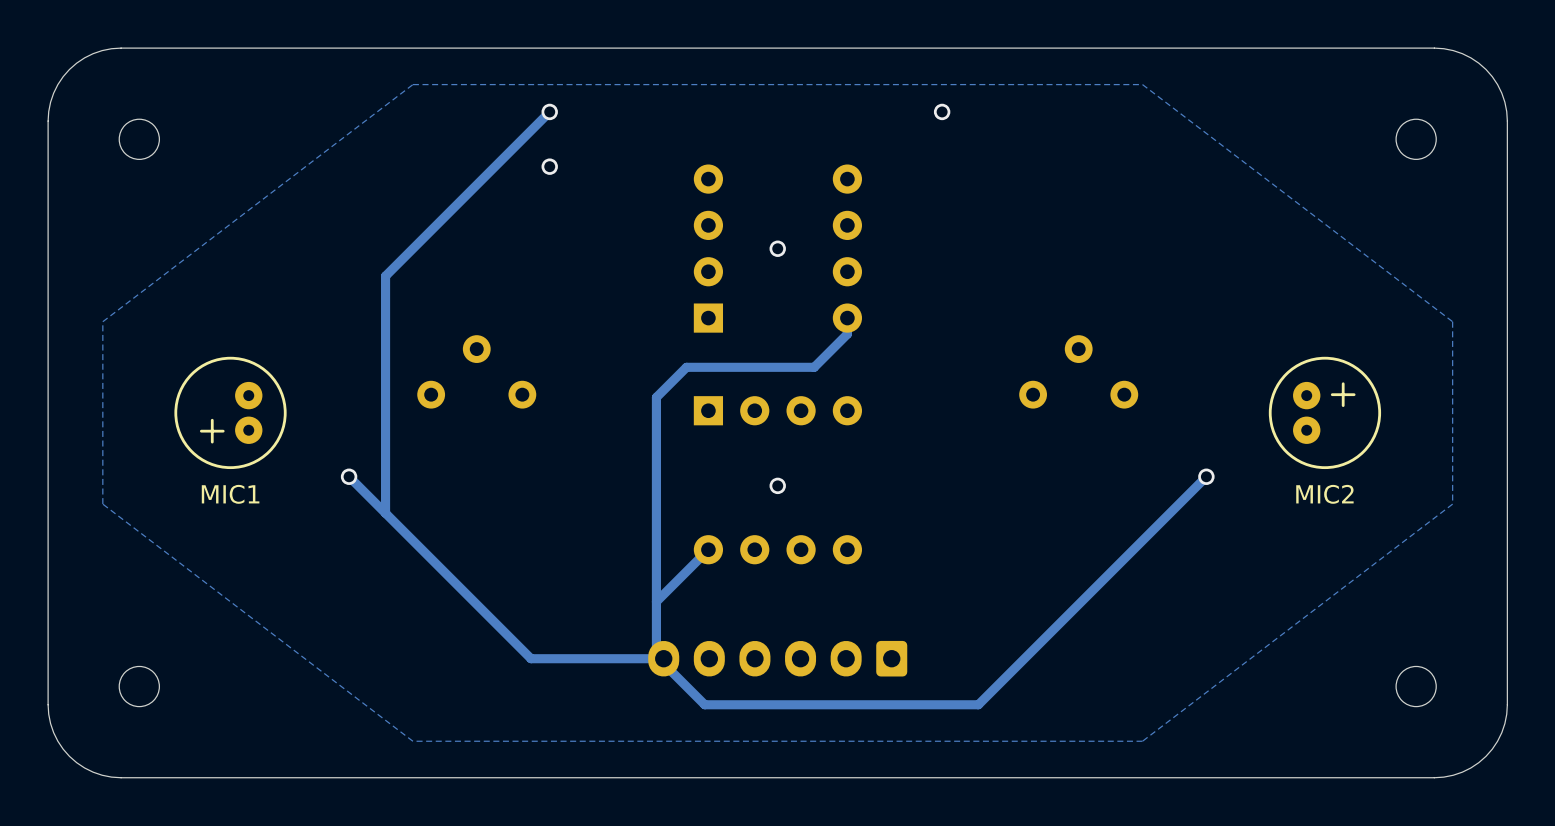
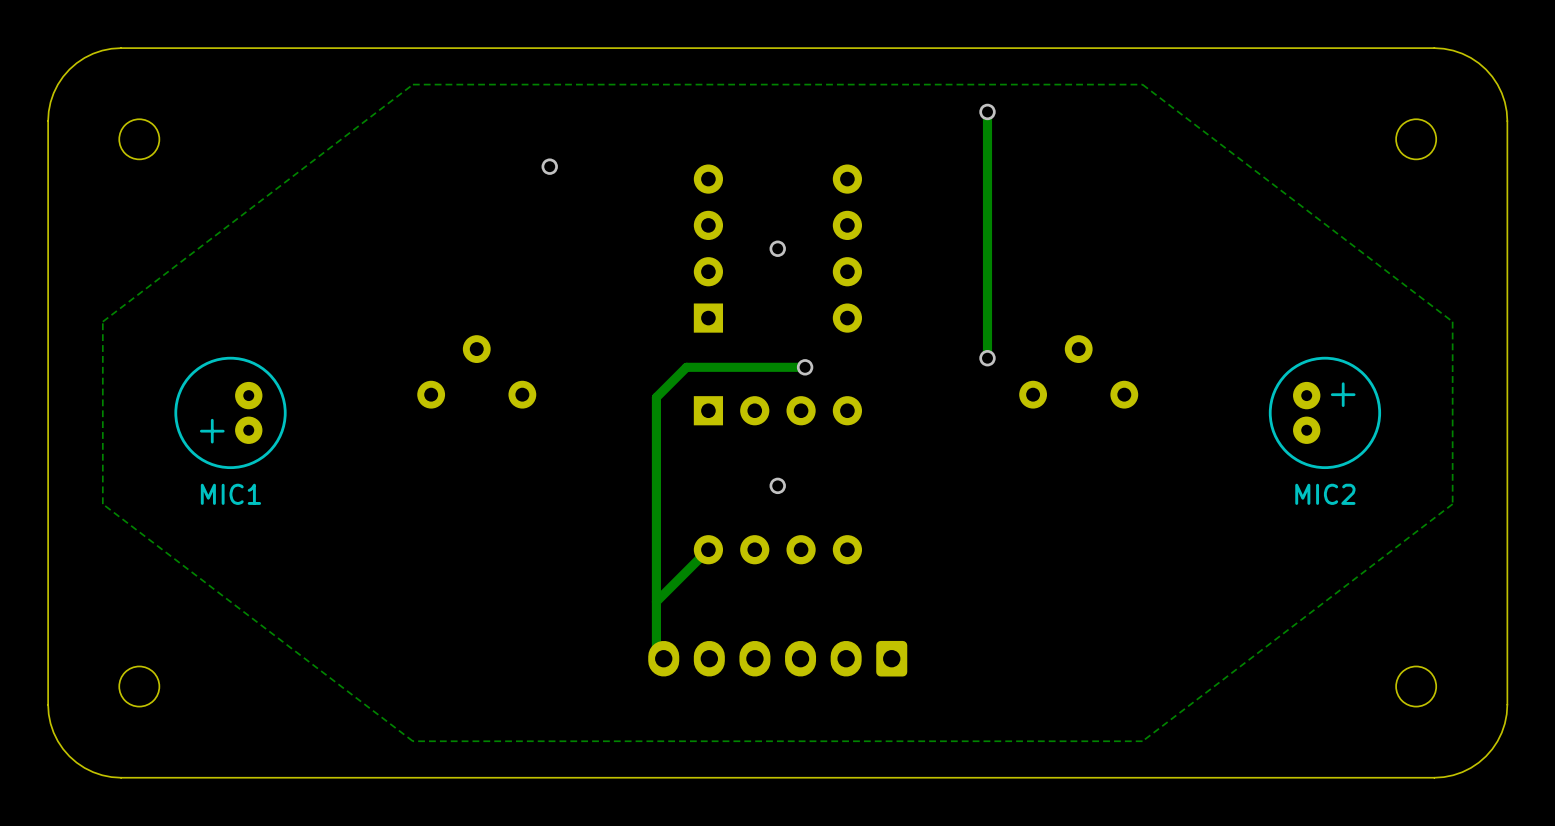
track: (549, 111) (385, 276) (385, 513) -> none
via: (549, 111) -> none
via position: (942, 111) -> (987, 111)
track: none -> (987, 111) (987, 358)
track: (847, 318) (847, 334) (814, 367) (805, 367) -> none
via: none -> (987, 358)
via: none -> (805, 367)
track: (349, 476) (531, 658) (663, 658) -> none
via: (349, 476) -> none
track: (1206, 476) (978, 704) (704, 704) (663, 663) -> none
via: (1206, 476) -> none

